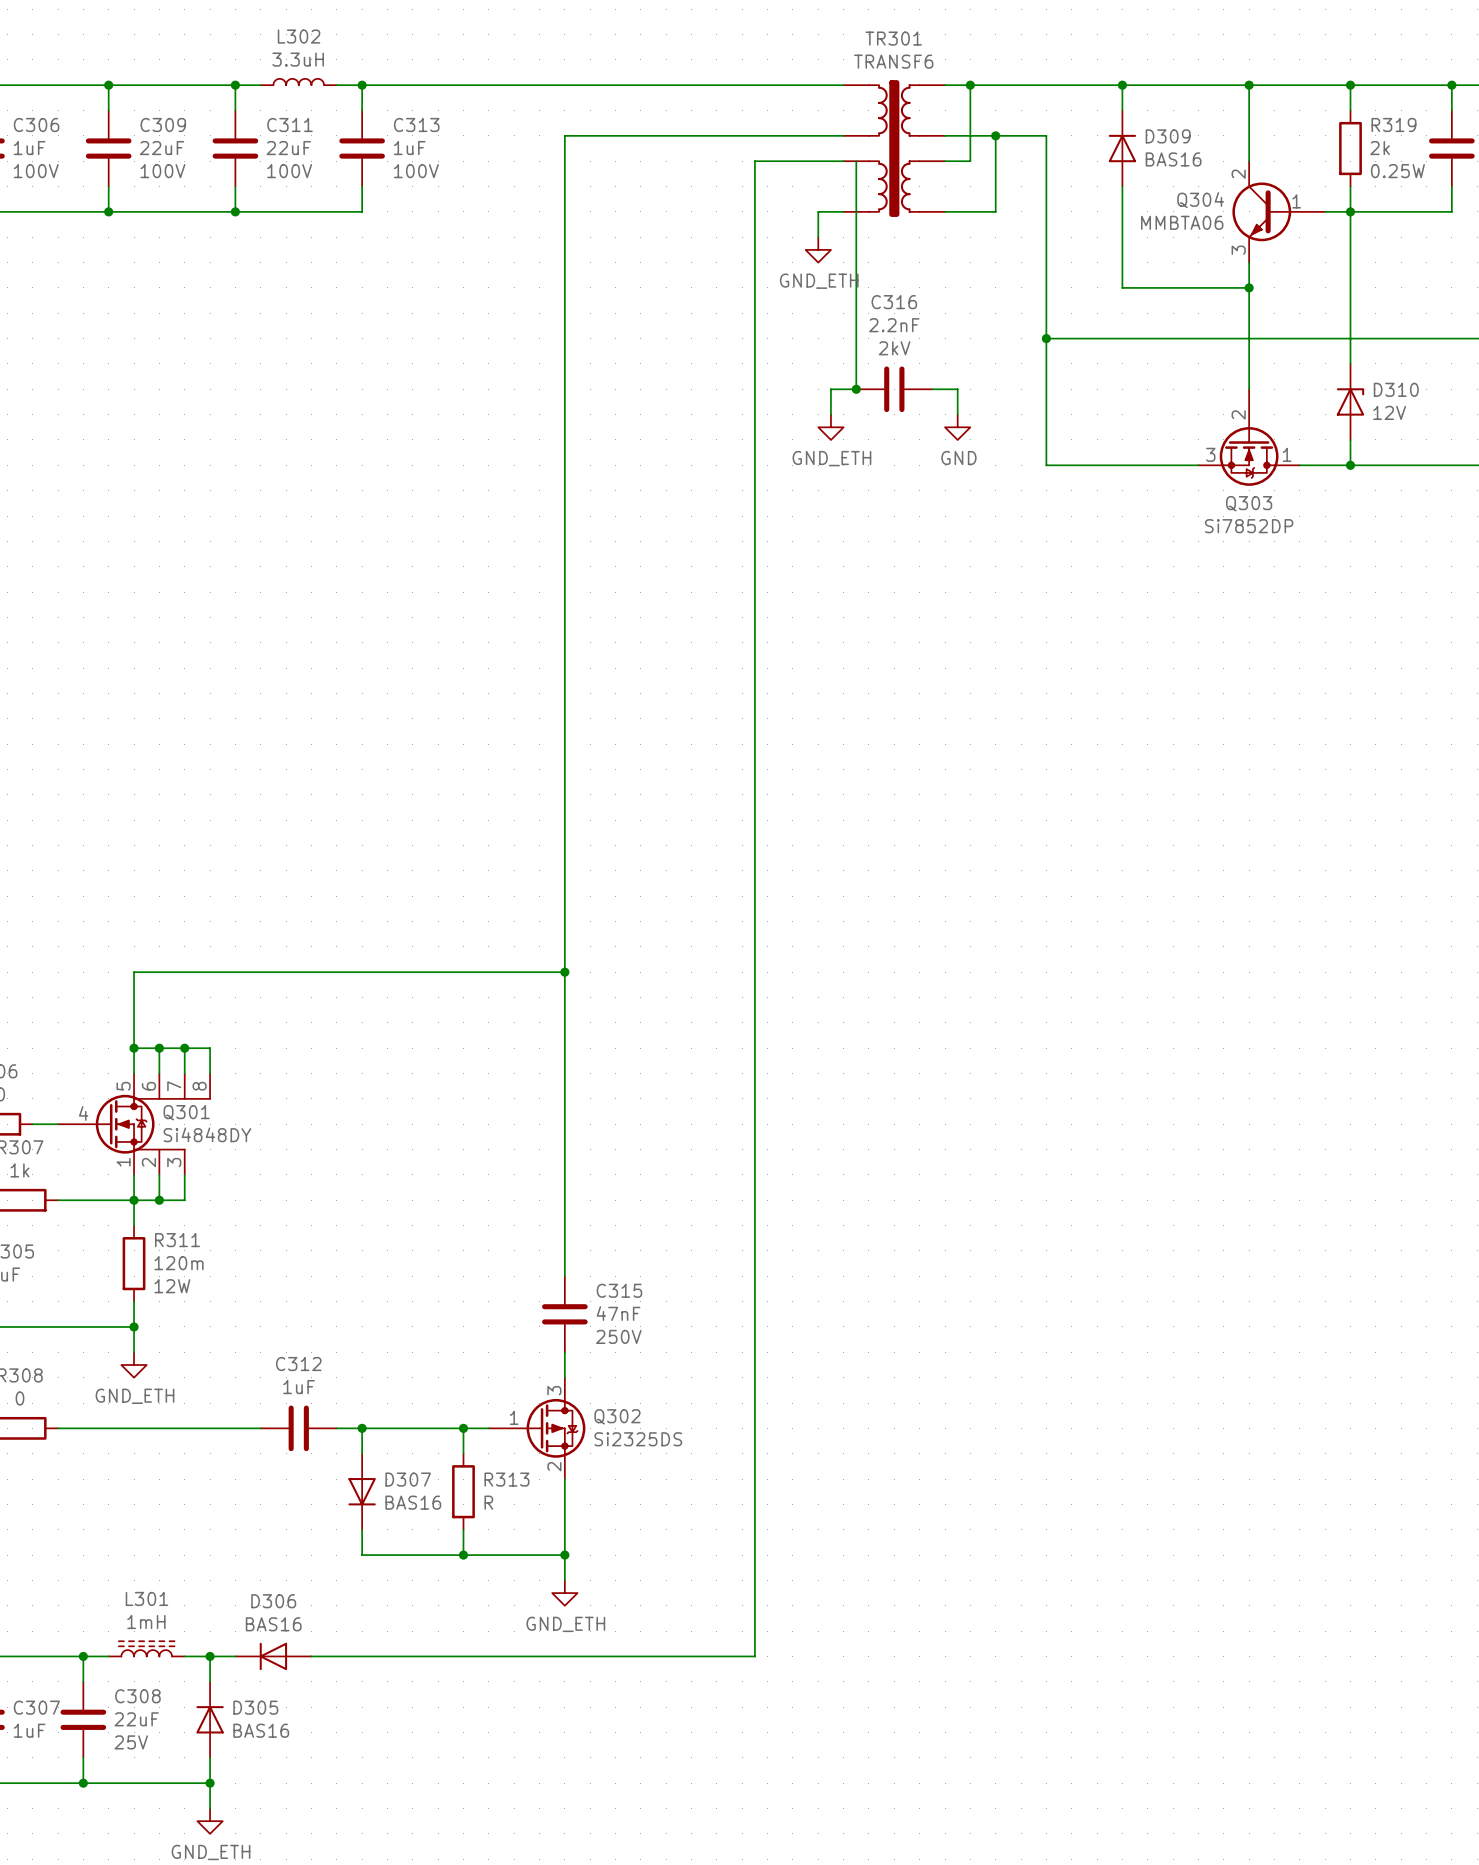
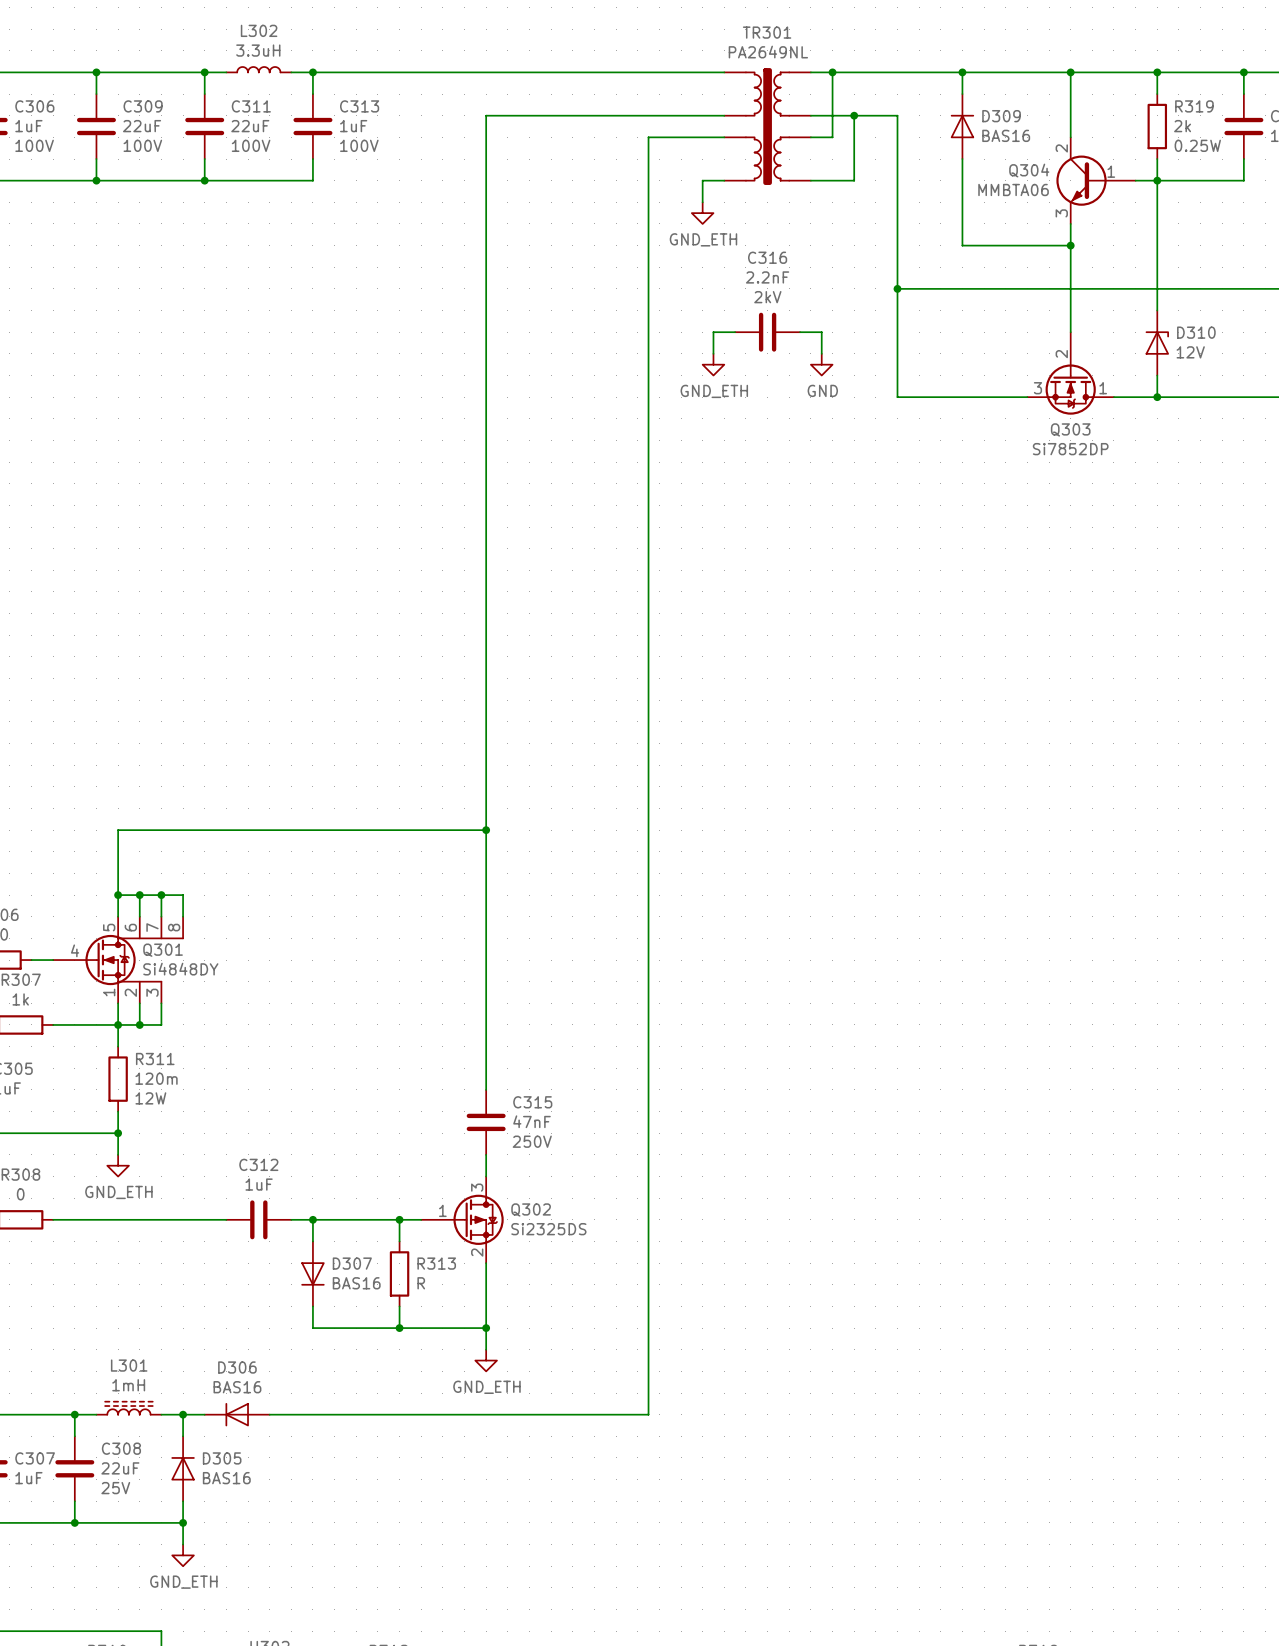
TR301 value: TRANSF6 (893, 61) -> PA2649NL (768, 52)
wire: (856, 161) (856, 389) -> none
junction: (856, 389) -> none

